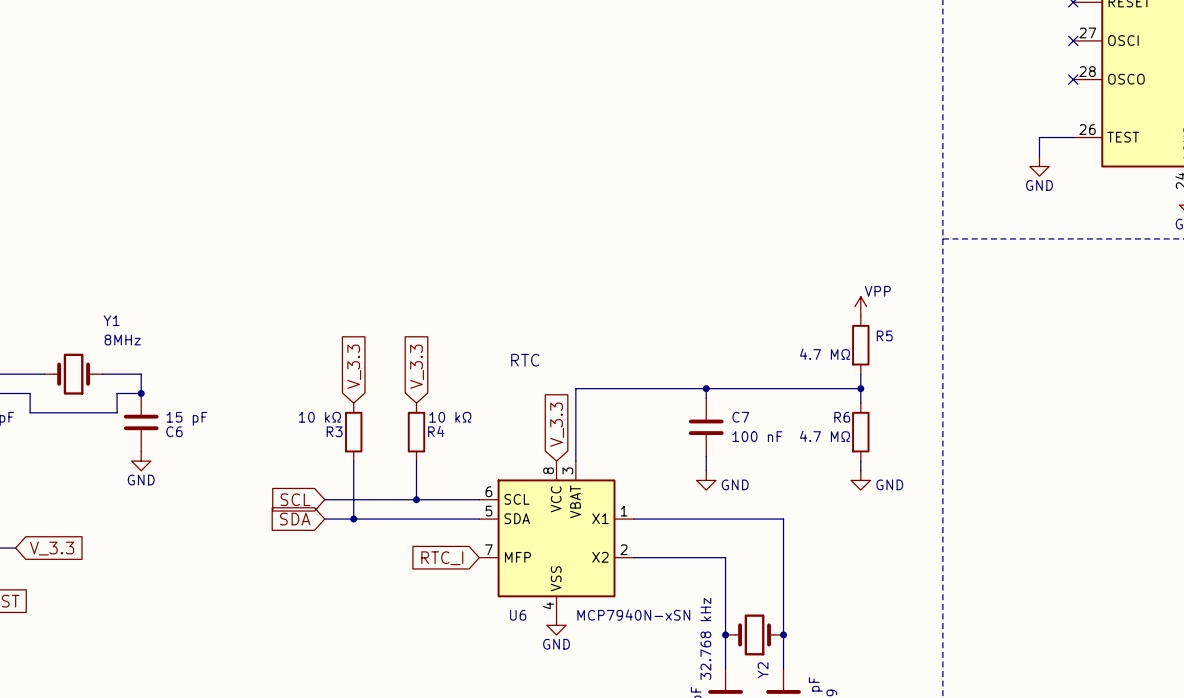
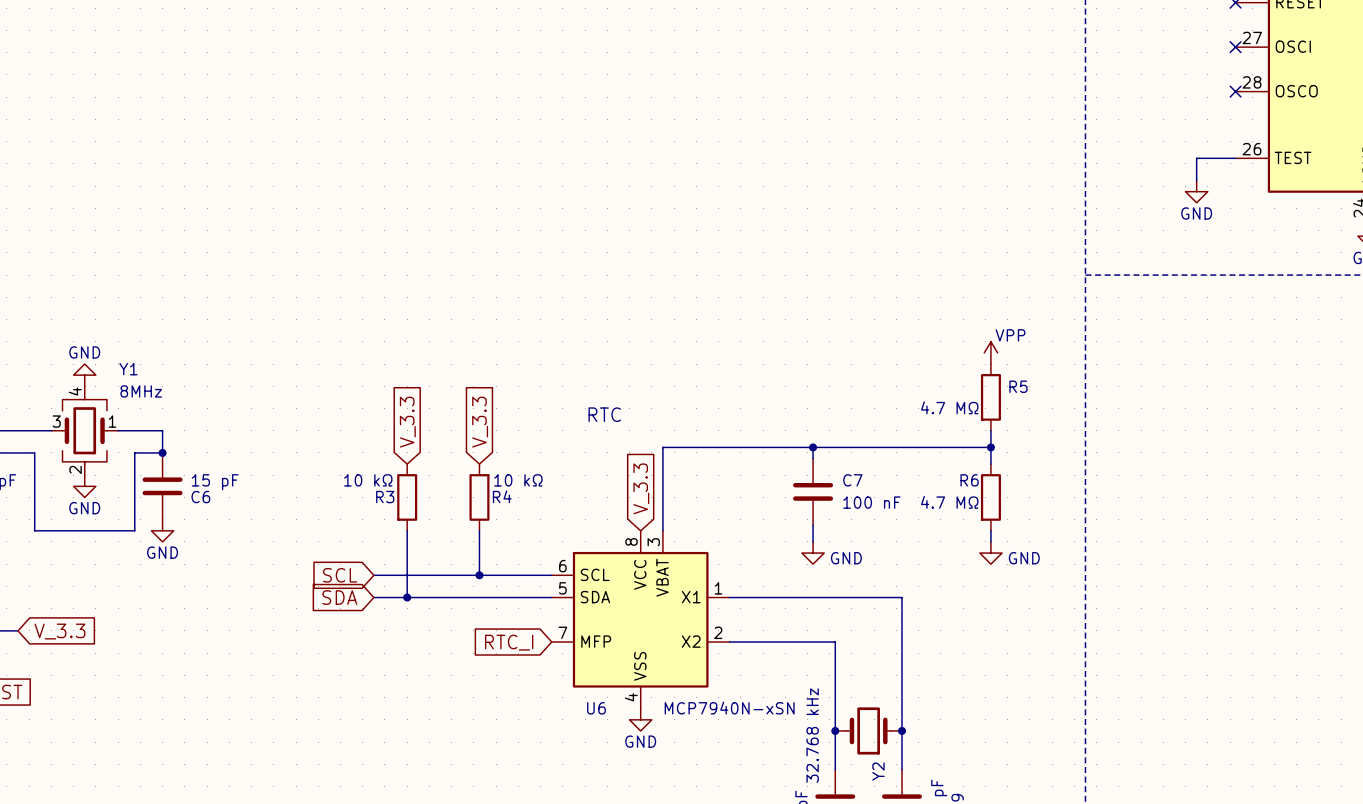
power symbol: none -> GND (84, 375)
Y1 symbol: [44, 353, 103, 395] -> [51, 386, 119, 476]
wire: (30, 412) (117, 412) -> (34, 475) (34, 530) (134, 530) (134, 475)
power symbol: none -> GND (84, 486)

